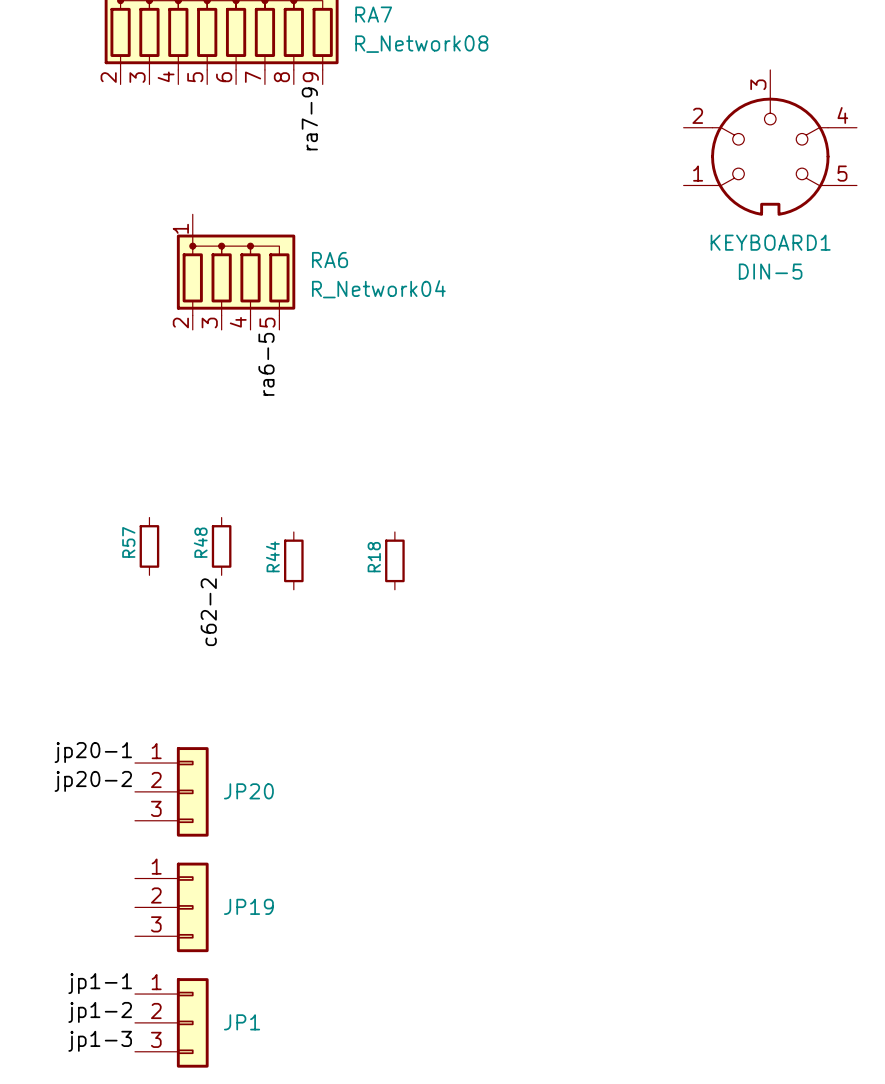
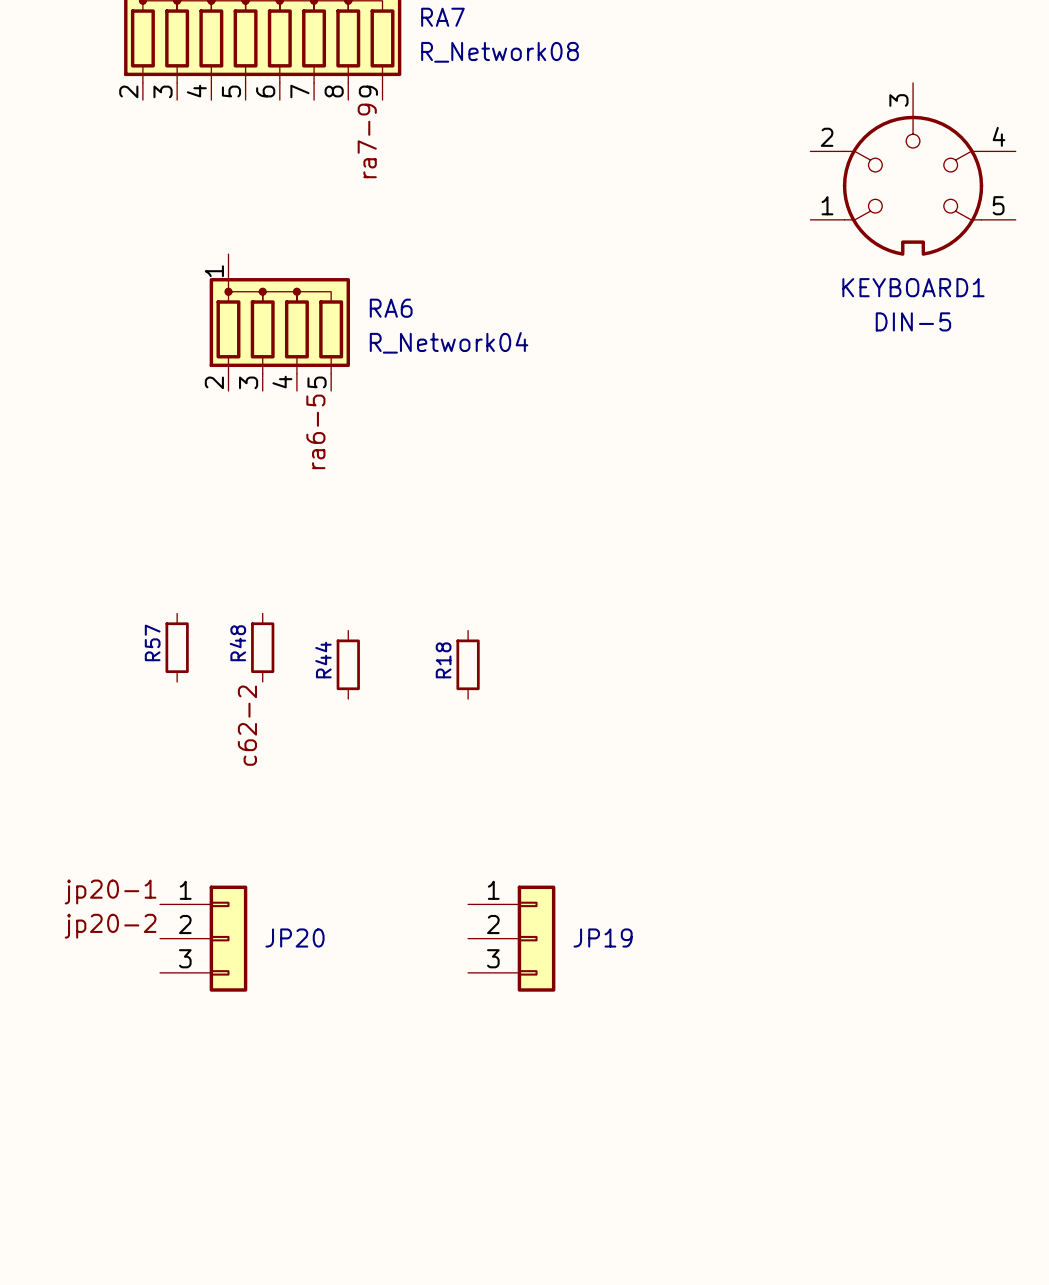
JP19 position: (171, 907) -> (511, 938)
label: jp1-1 (100, 983) -> none
label: jp1-2 (100, 1012) -> none
JP1: (171, 1022) -> none
label: jp1-3 (100, 1041) -> none

